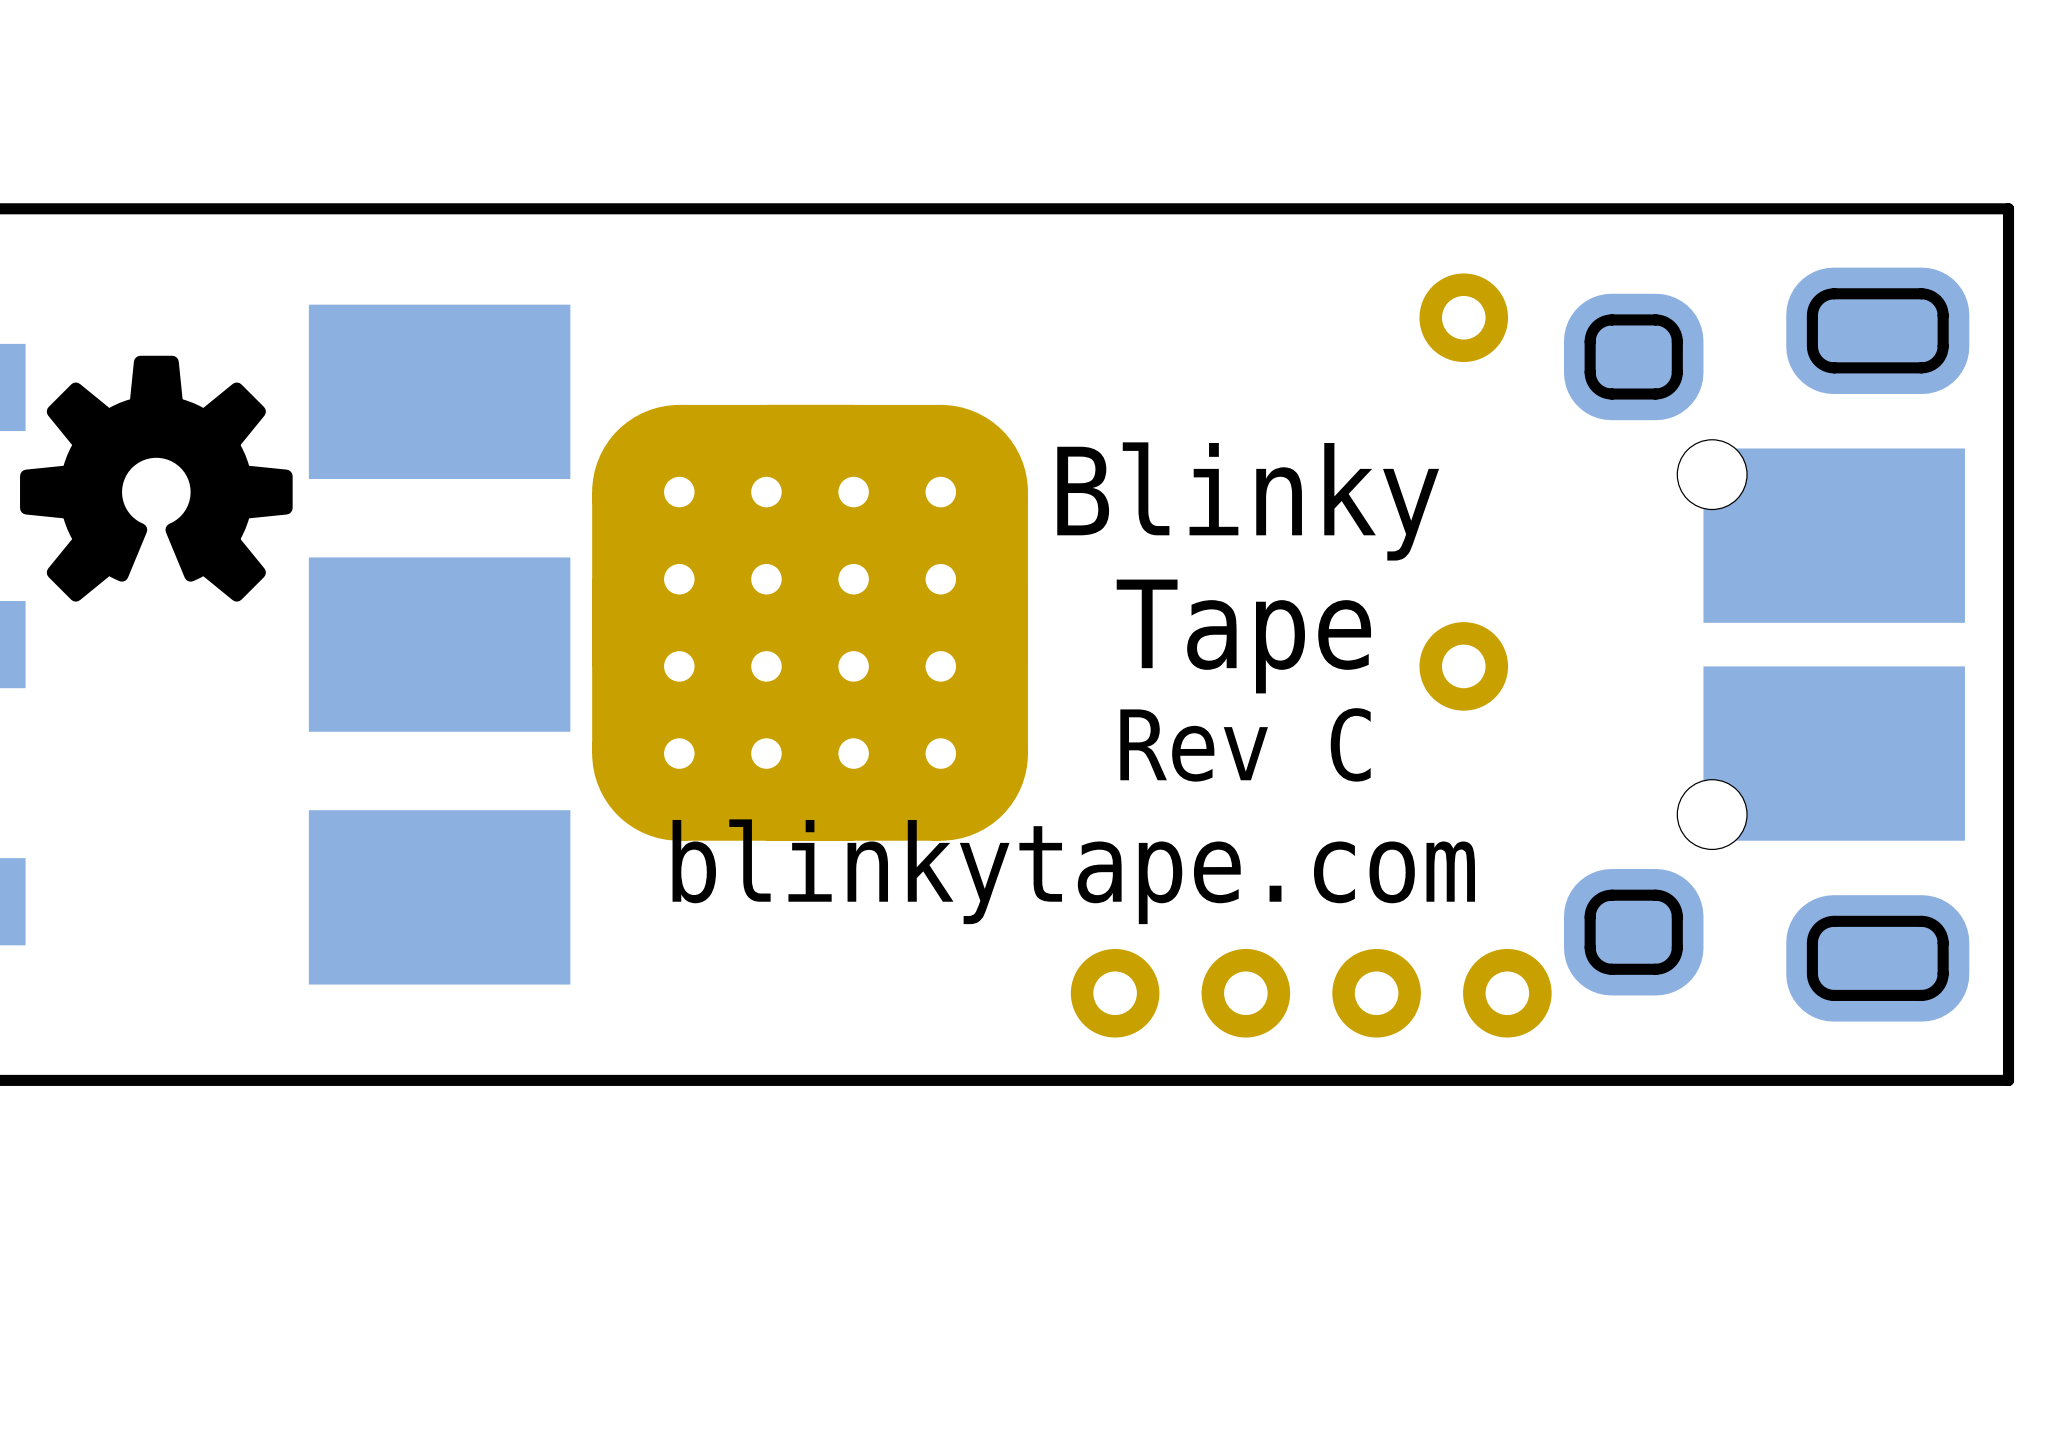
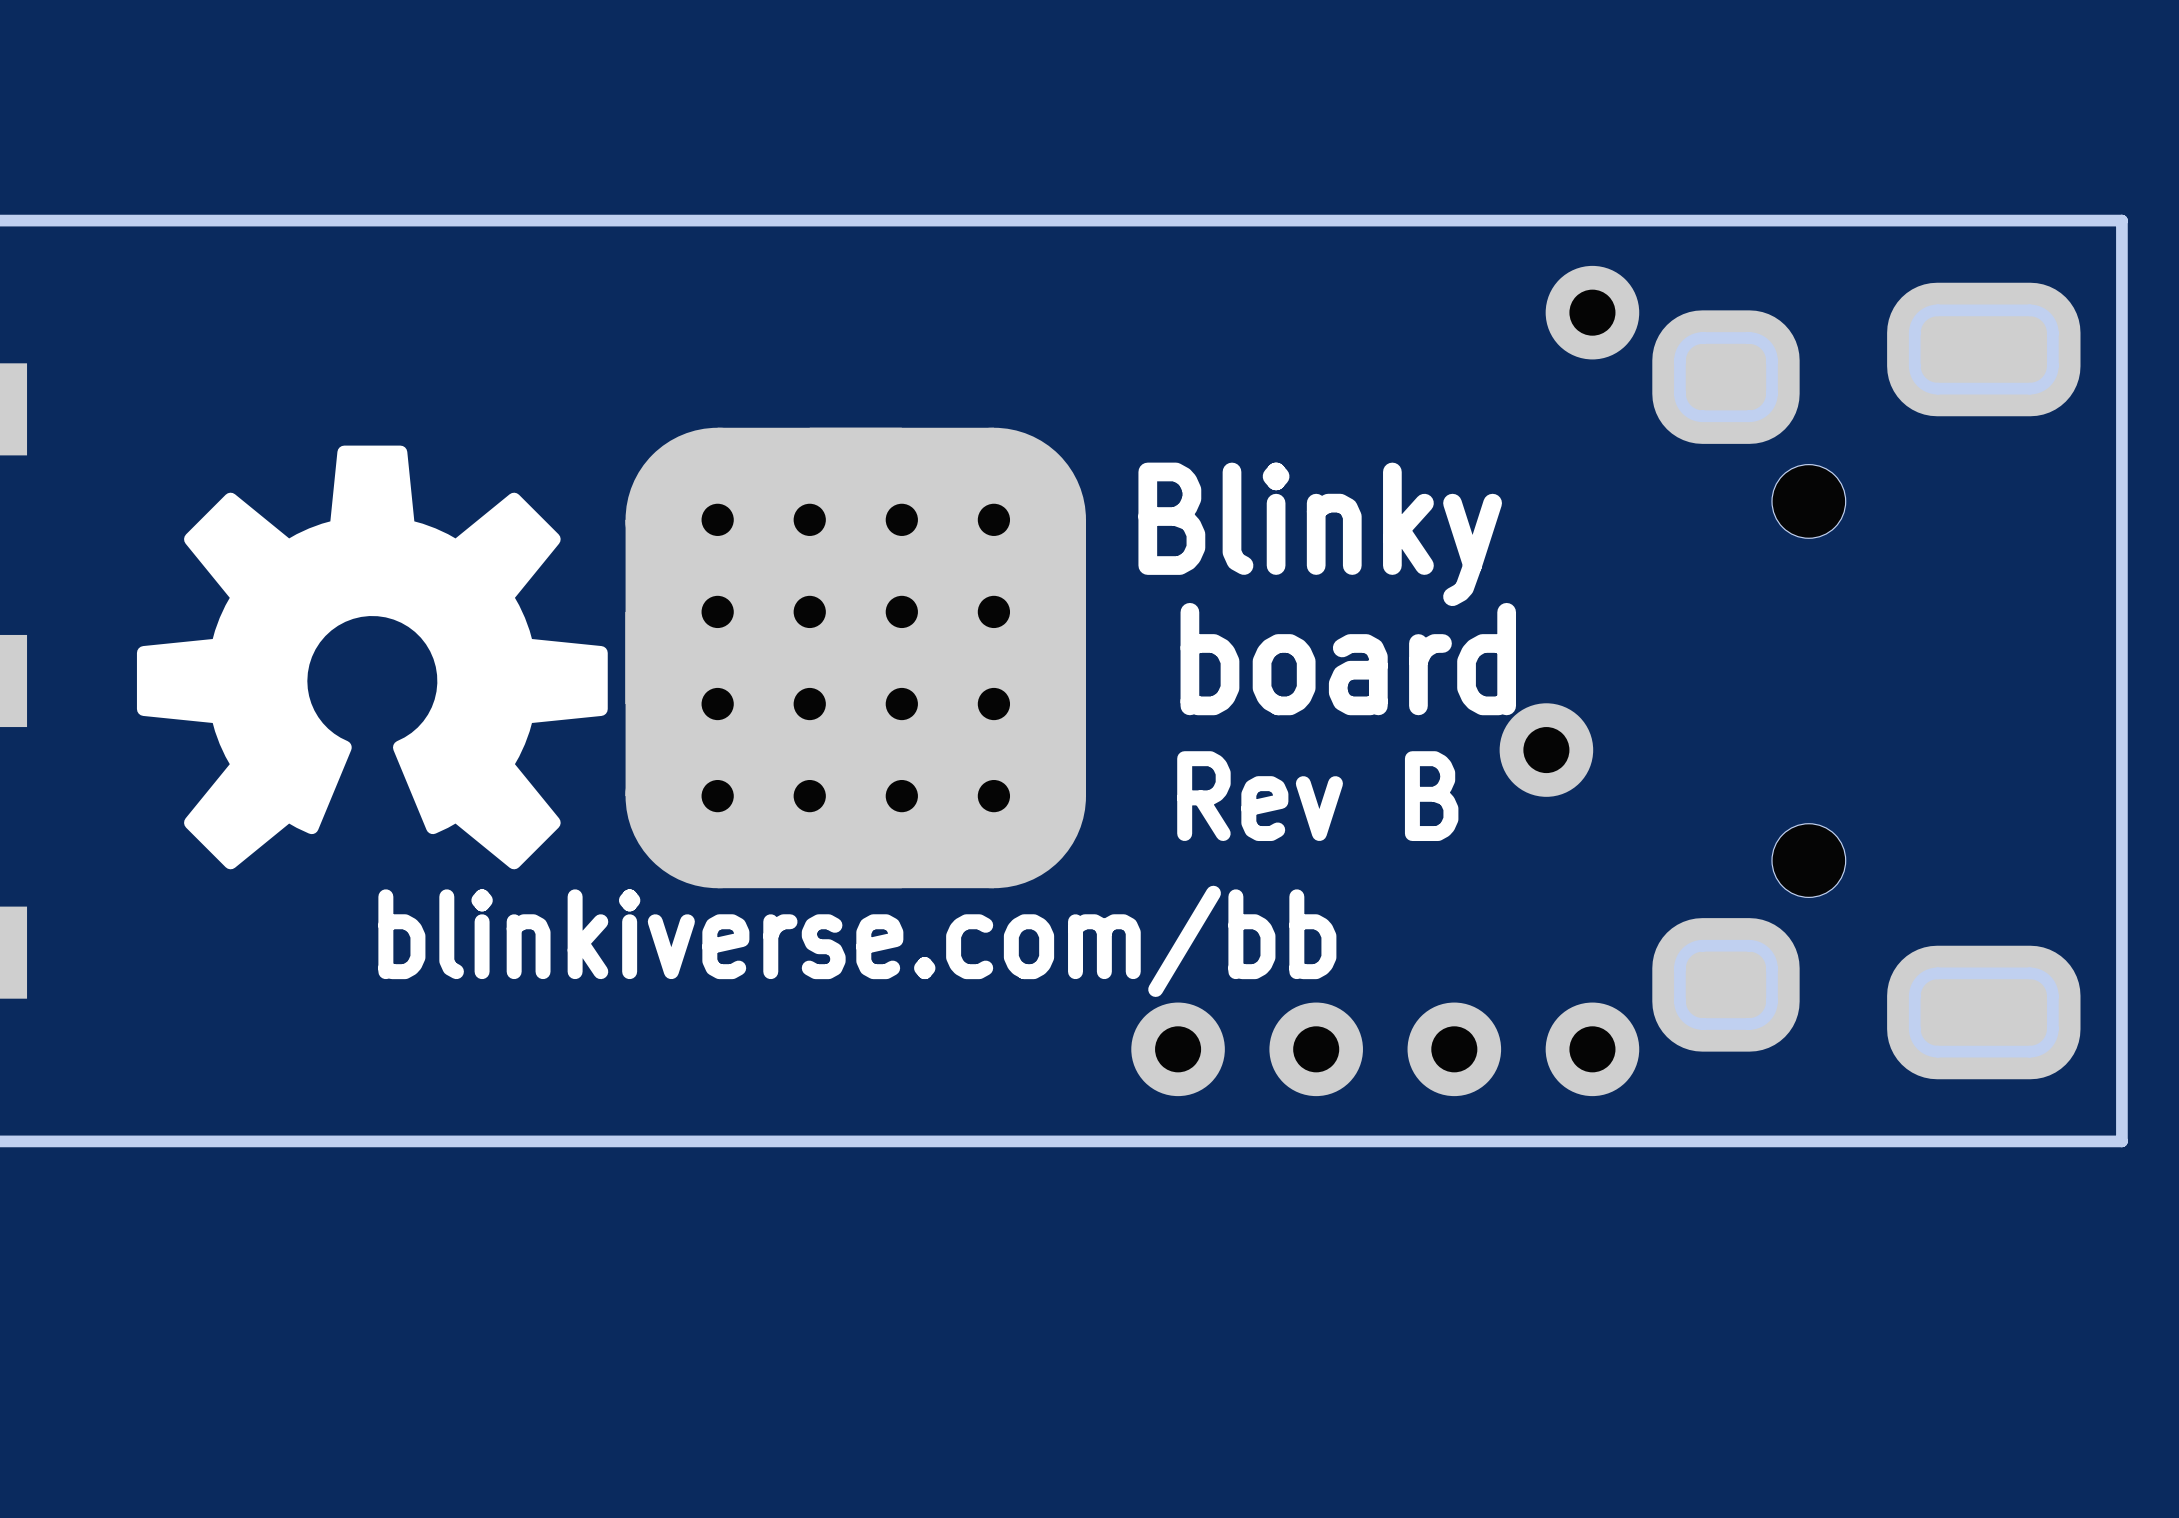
part position: (1463, 317) -> (1592, 312)
drawing: [20, 355, 293, 602] -> none
part: (439, 391) -> none
drawing: none -> [136, 445, 608, 870]
part: (1834, 535) -> none
text: Tape (1243, 636) -> board (1348, 659)
part: (439, 644) -> none
part position: (1463, 666) -> (1546, 750)
text: Rev C (1245, 744) -> Rev B (1317, 796)
part: (1834, 753) -> none
text: blinkytape.com (1073, 871) -> blinkiverse.com/bb (857, 941)
part: (439, 897) -> none

